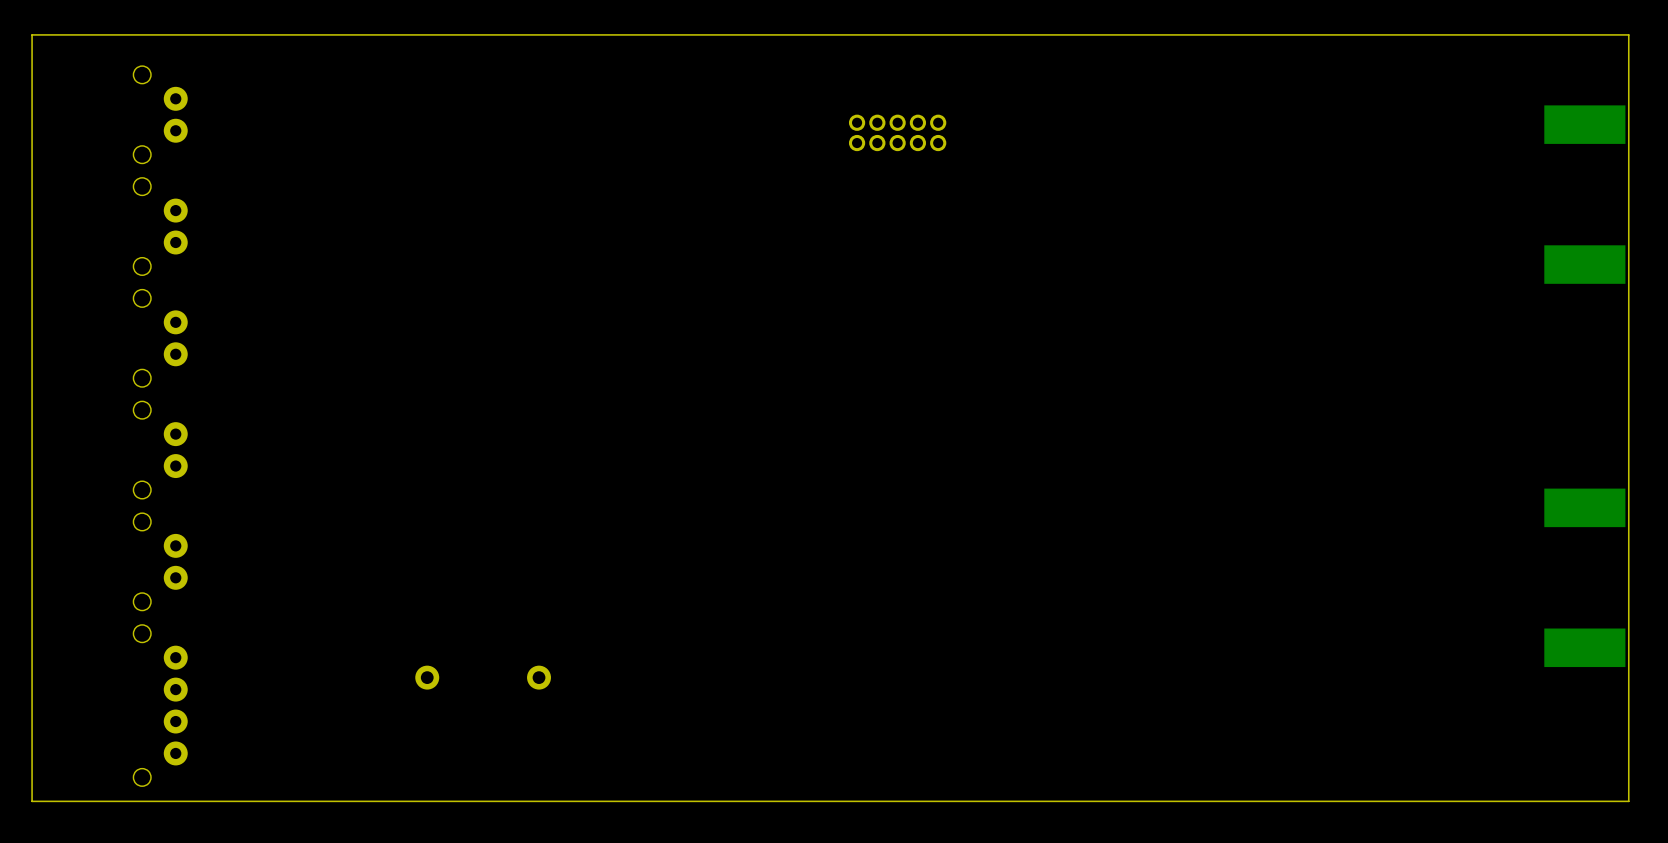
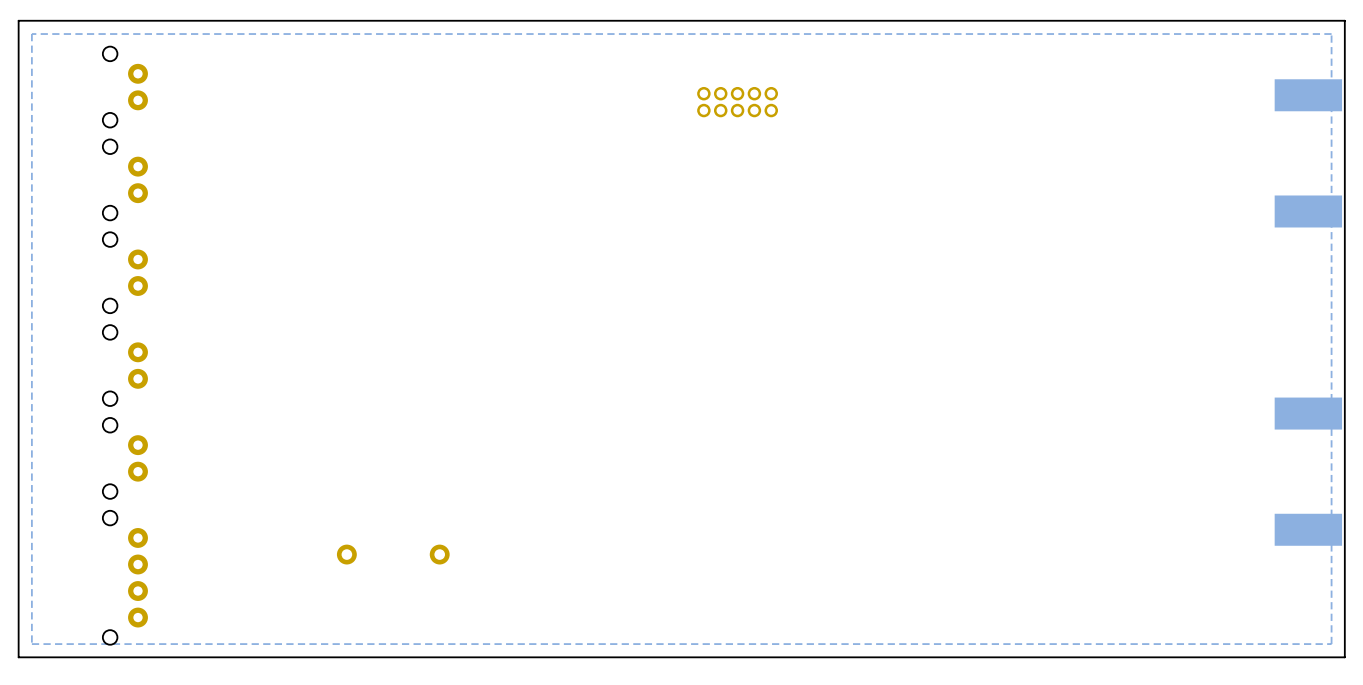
zone outline: none -> (1331, 34) (1331, 644) (31, 644) (31, 34) (1331, 34)

